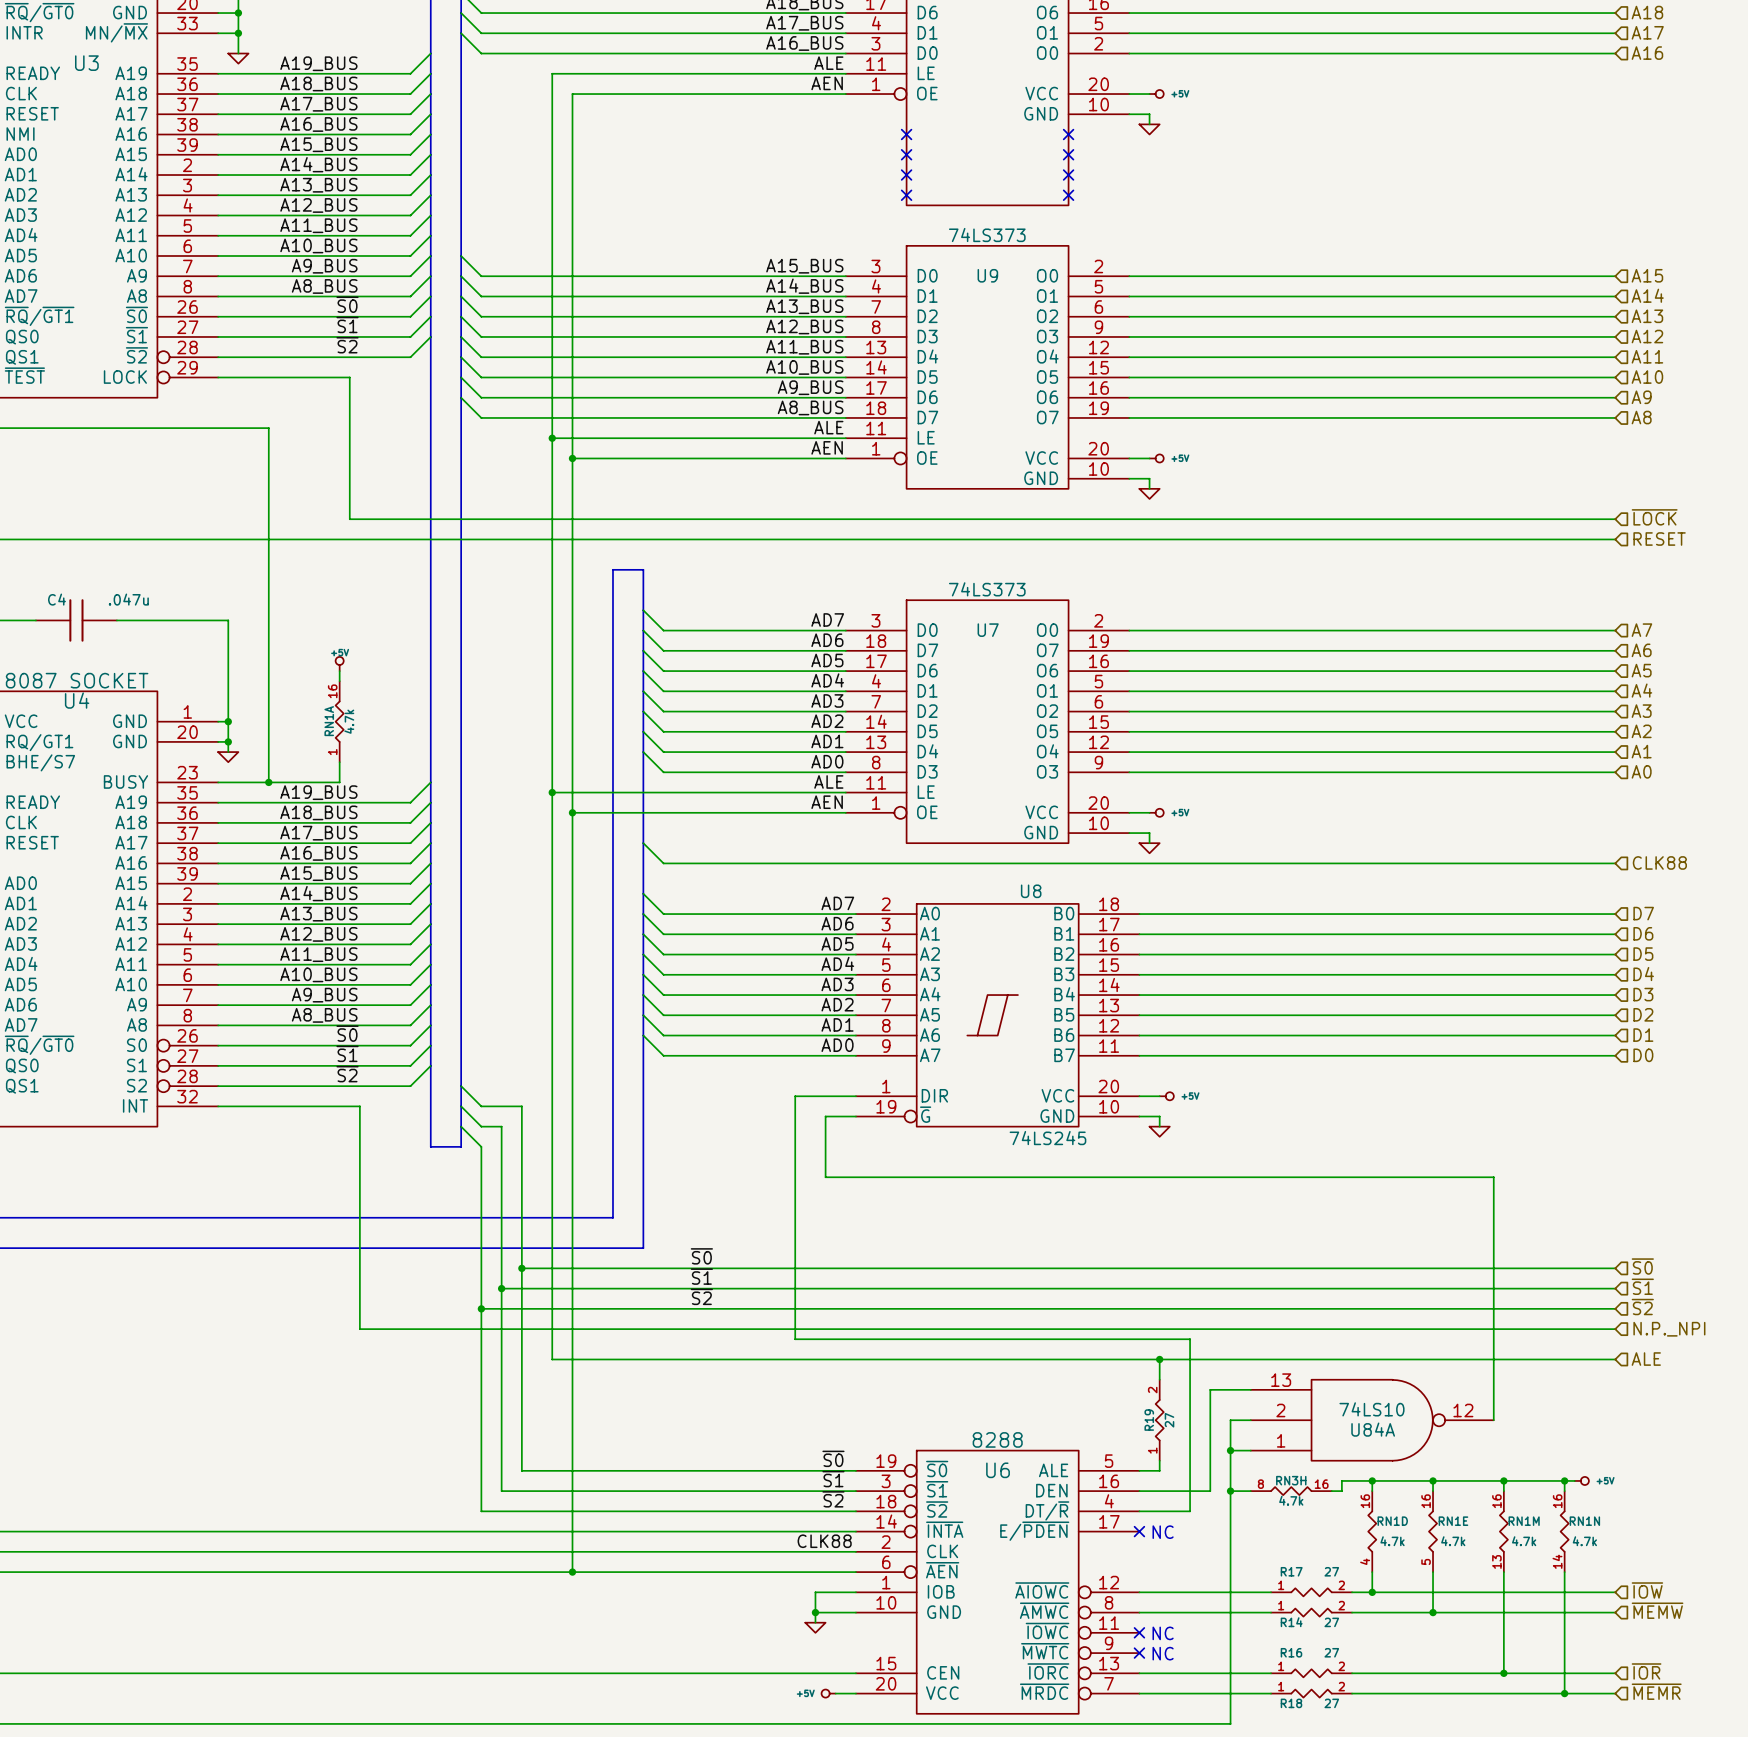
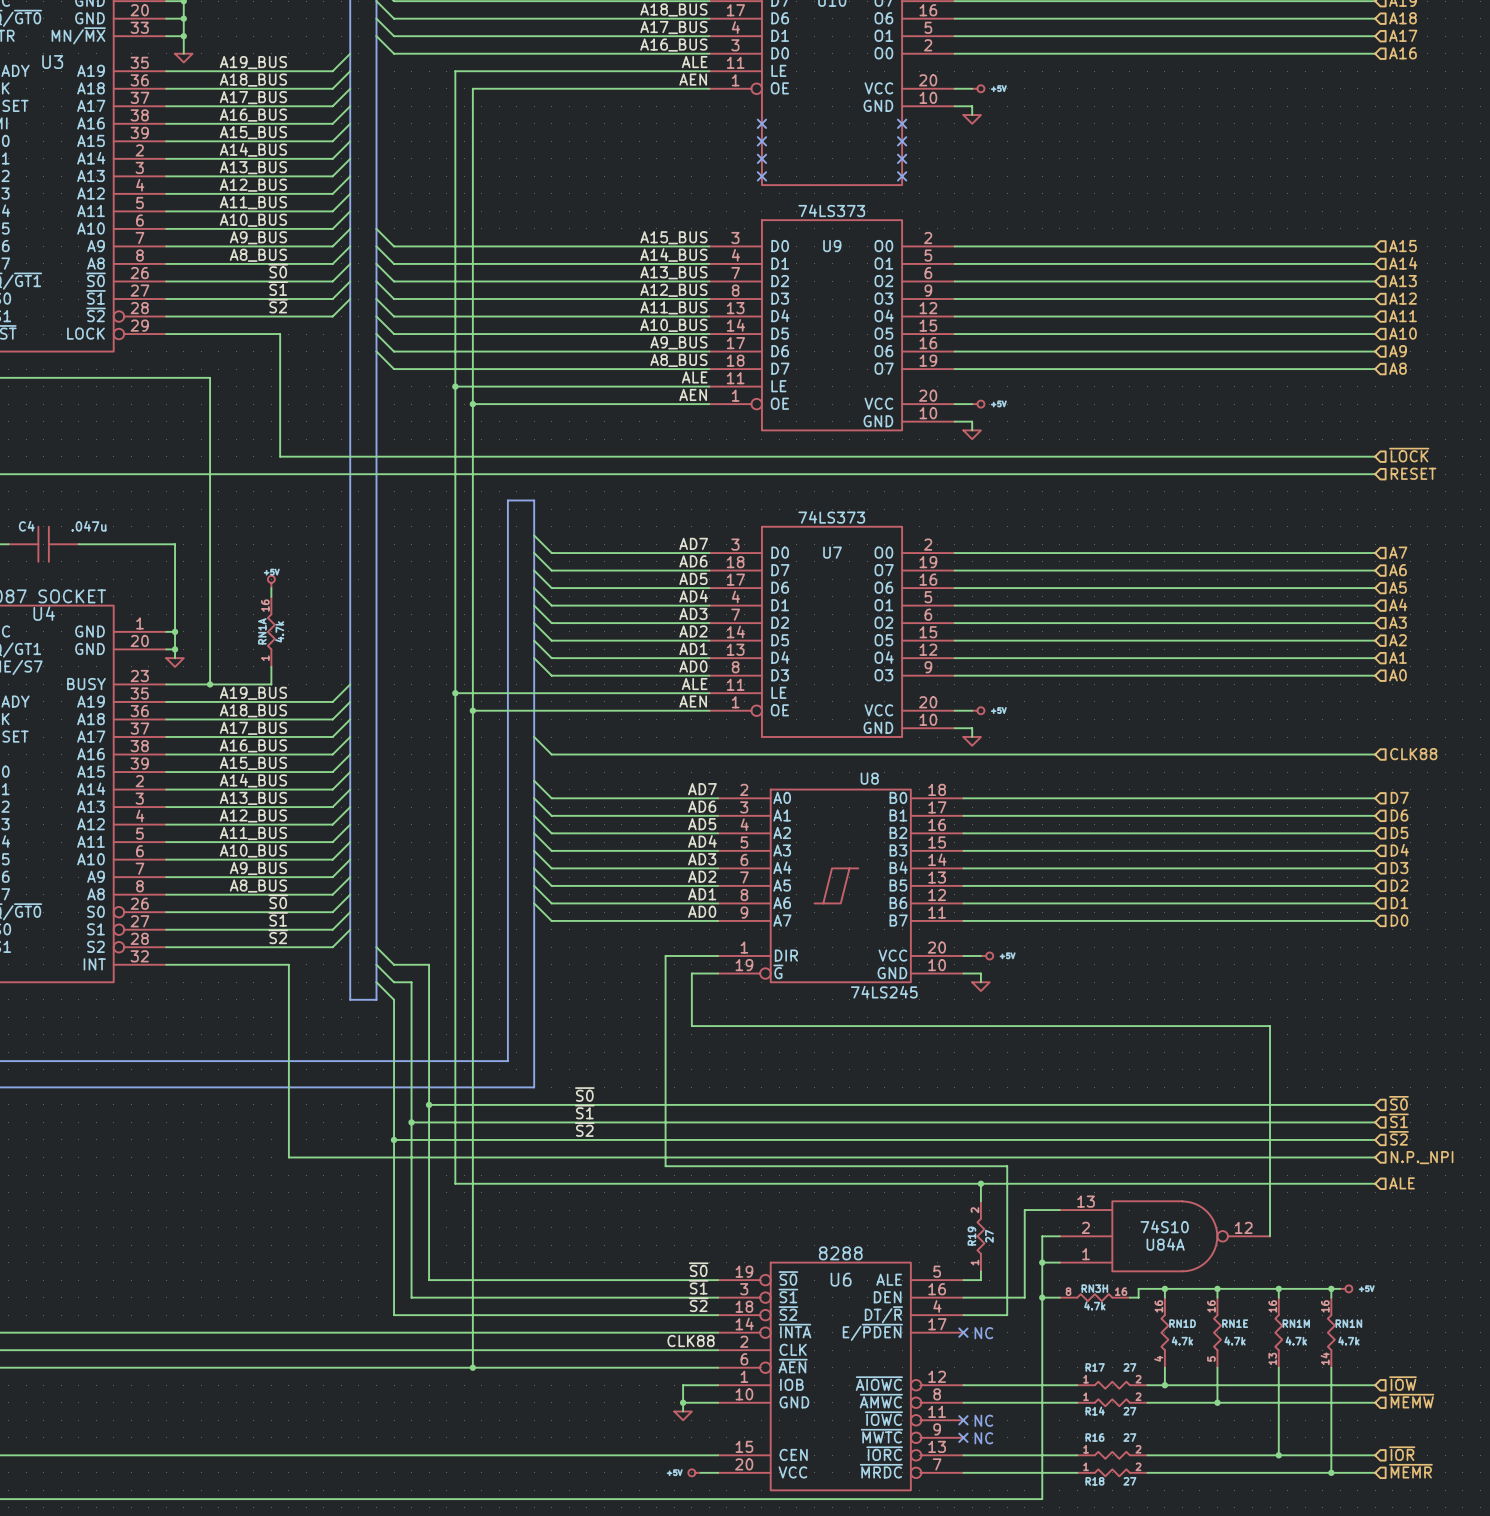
U84A value: 74LS10 (1371, 1409) -> 74S10 (1164, 1226)

